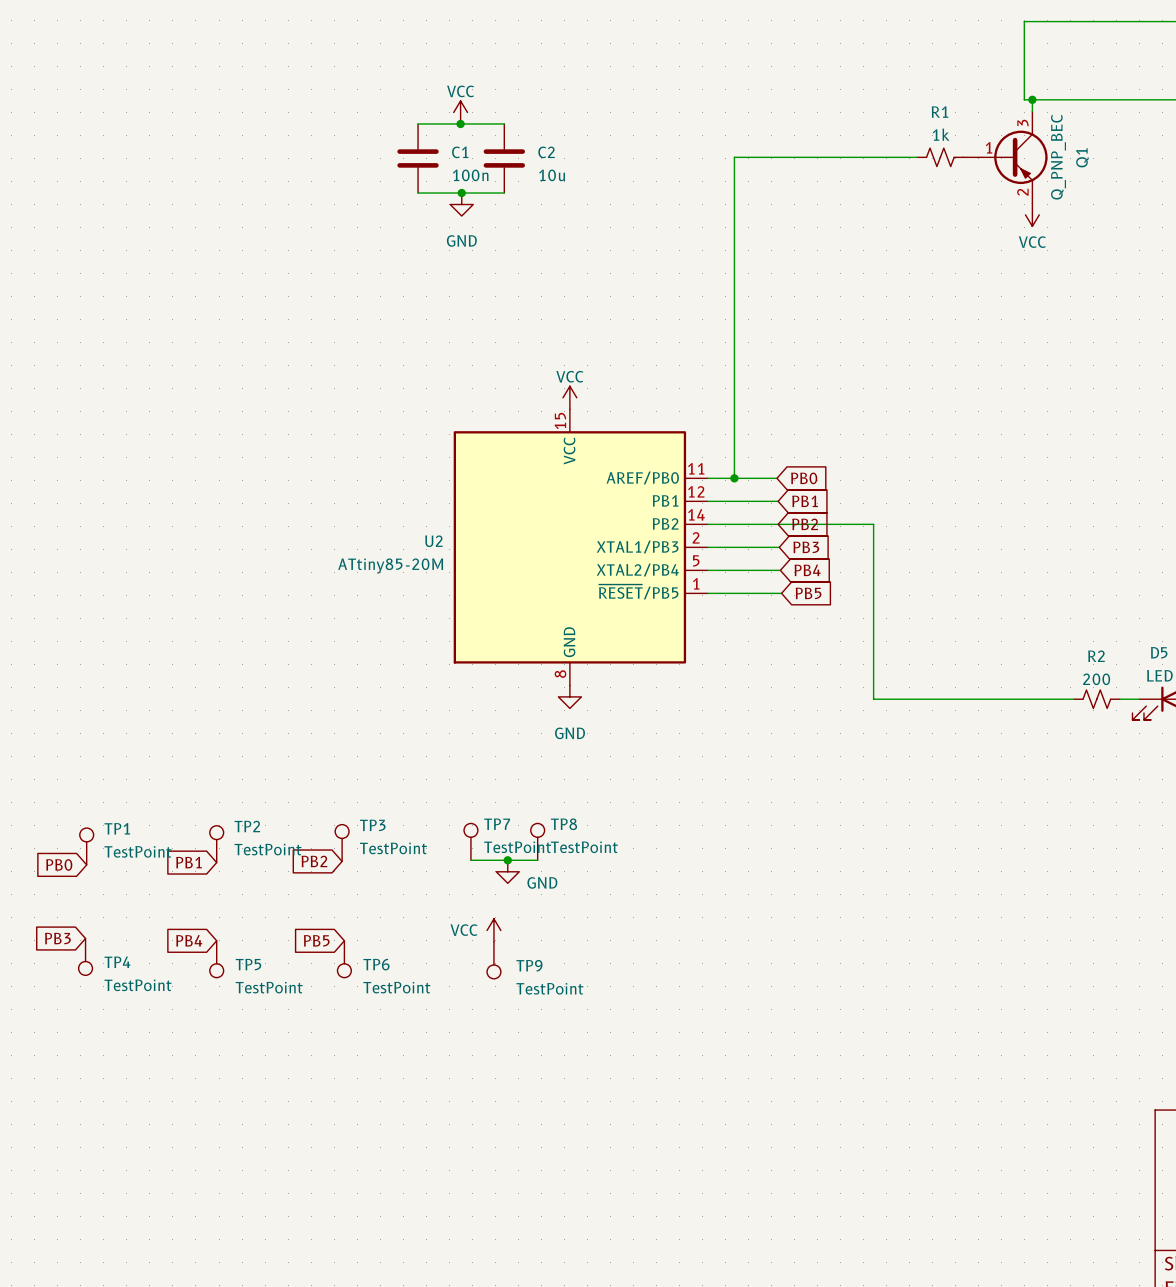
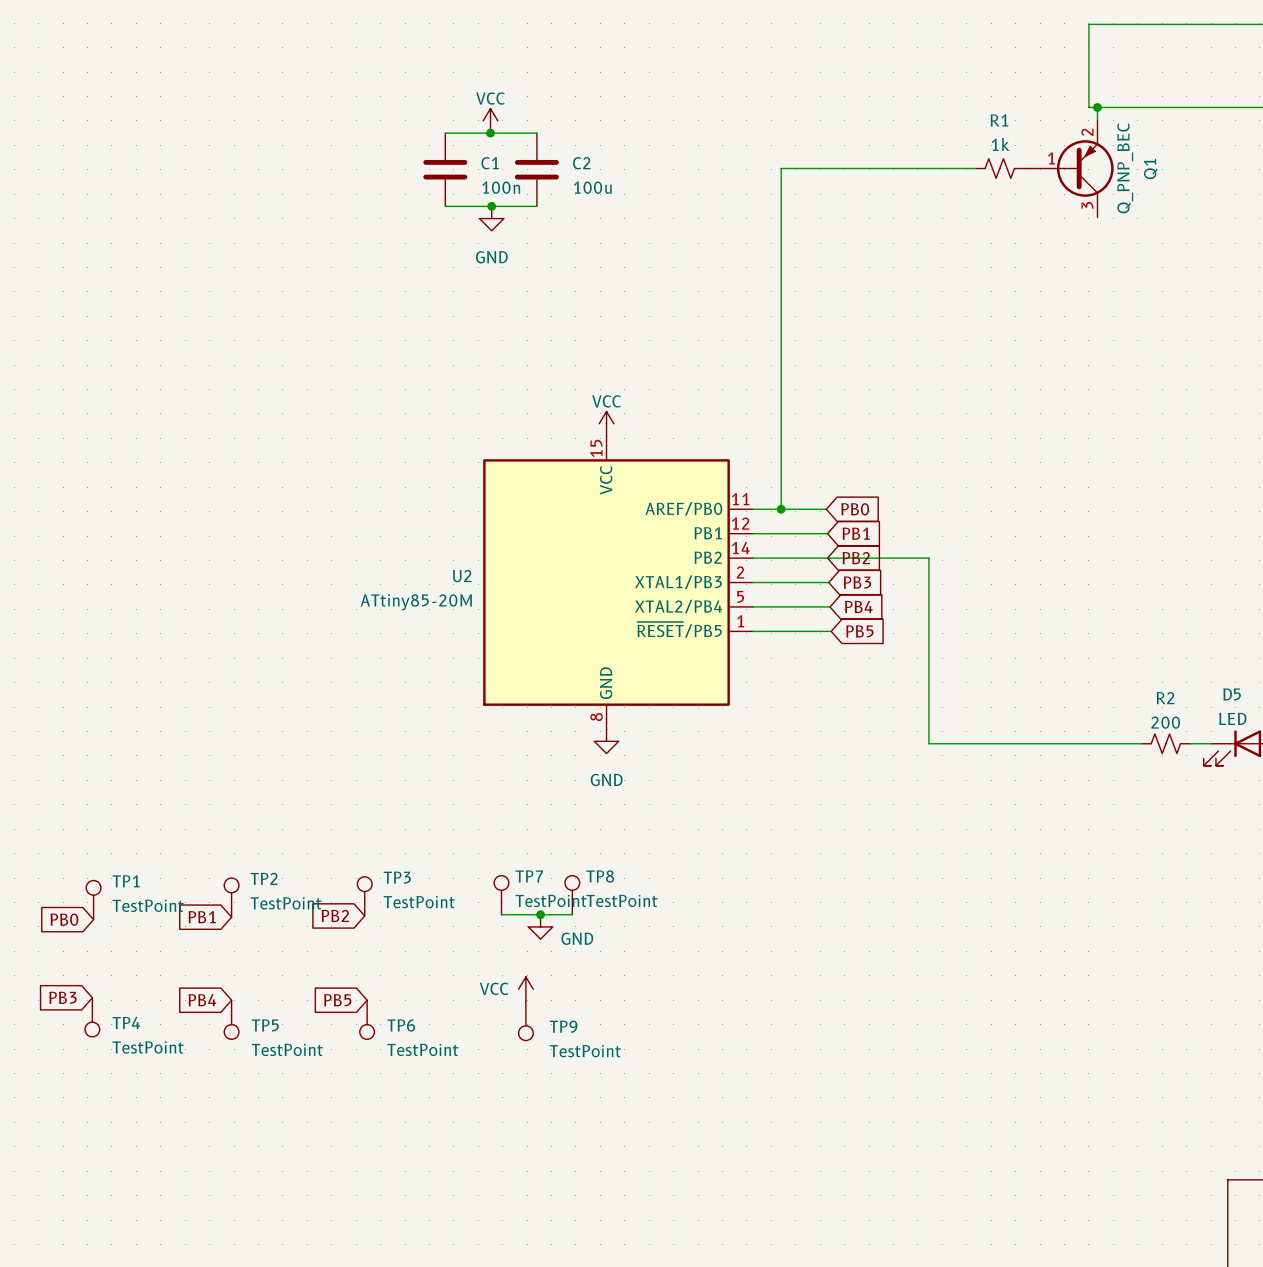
Q1 flip: as is (1020, 157) -> up-down (1085, 168)
C2 value: 10u (552, 175) -> 100u (592, 187)
power symbol: VCC (1032, 214) -> none

